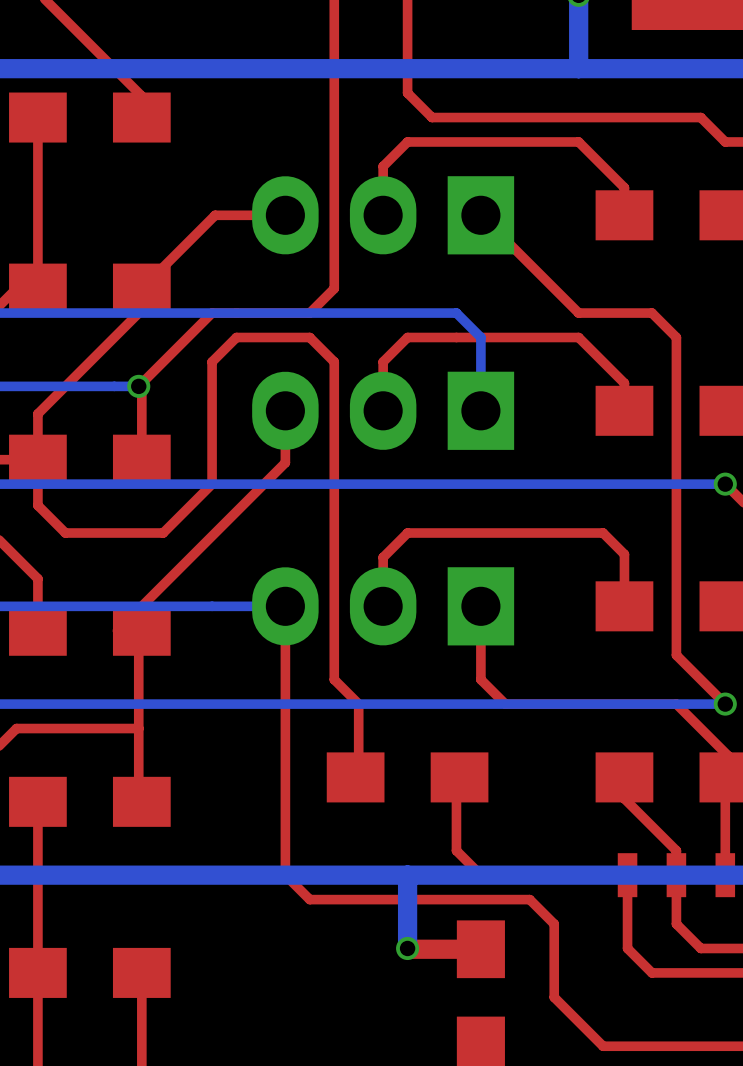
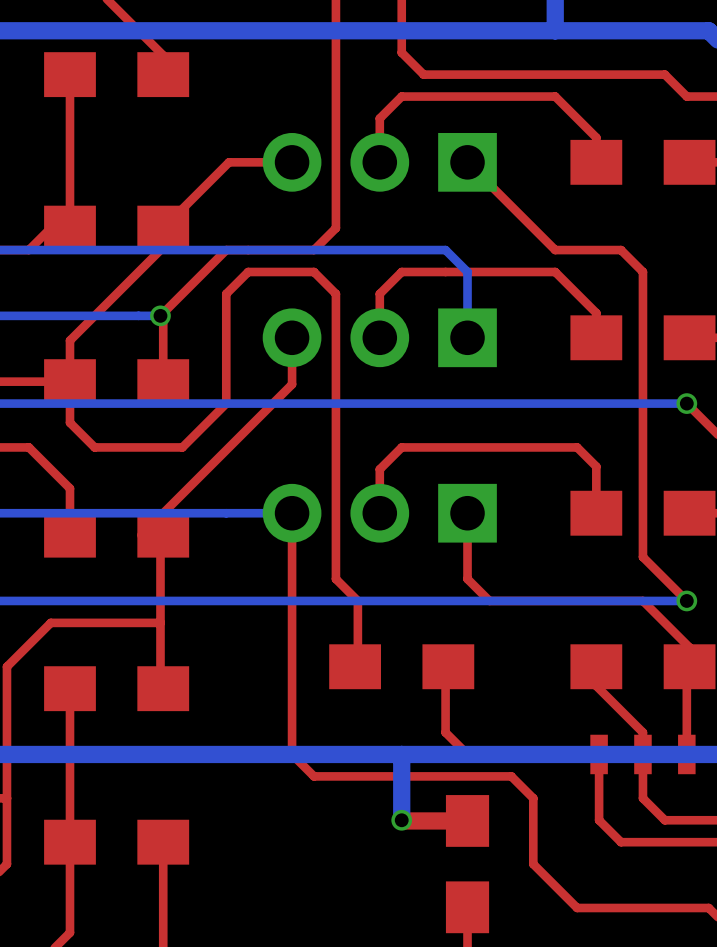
part footprint: [252, 176, 515, 255] -> [262, 132, 497, 192]
part footprint: [252, 371, 515, 450] -> [262, 308, 497, 368]
part footprint: [252, 567, 515, 646] -> [262, 483, 497, 543]

